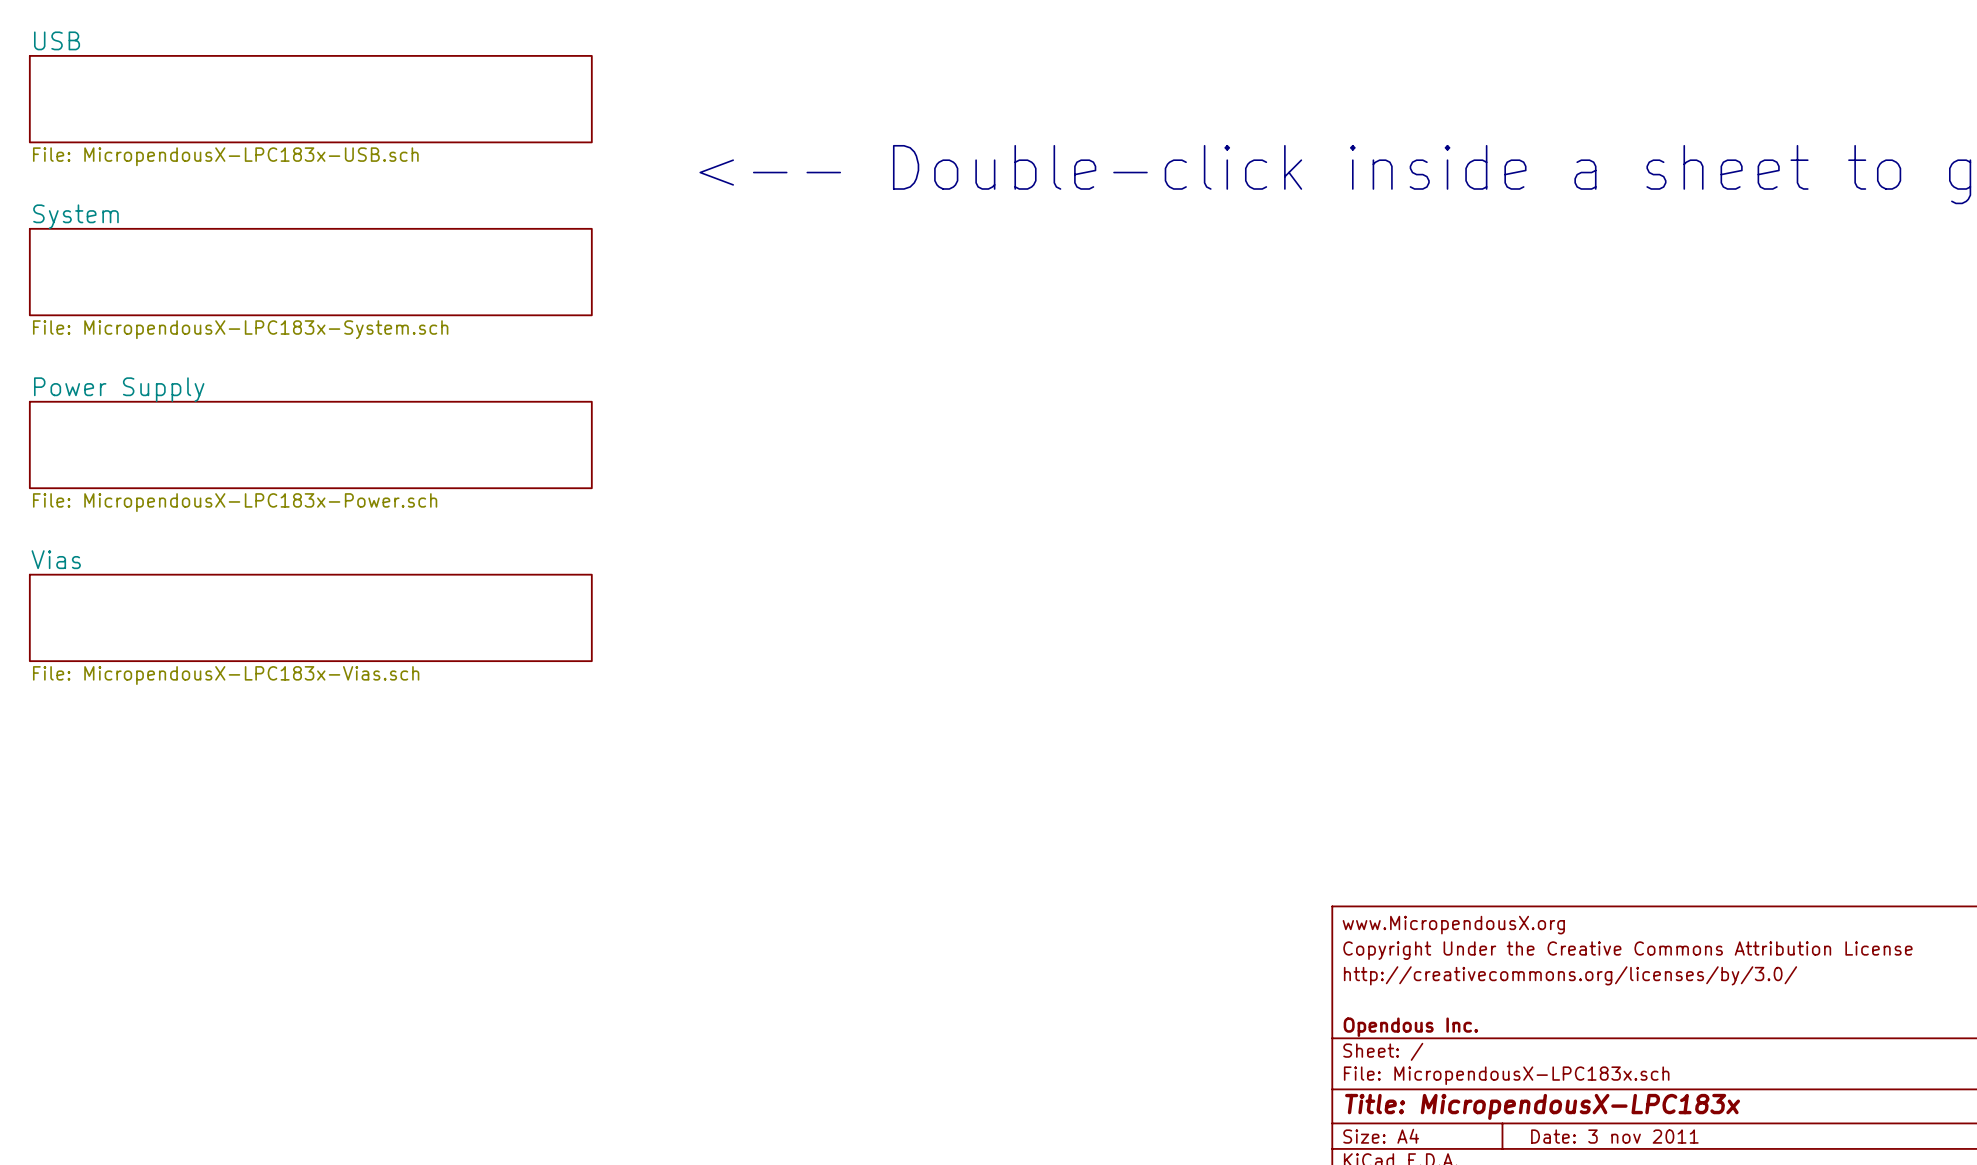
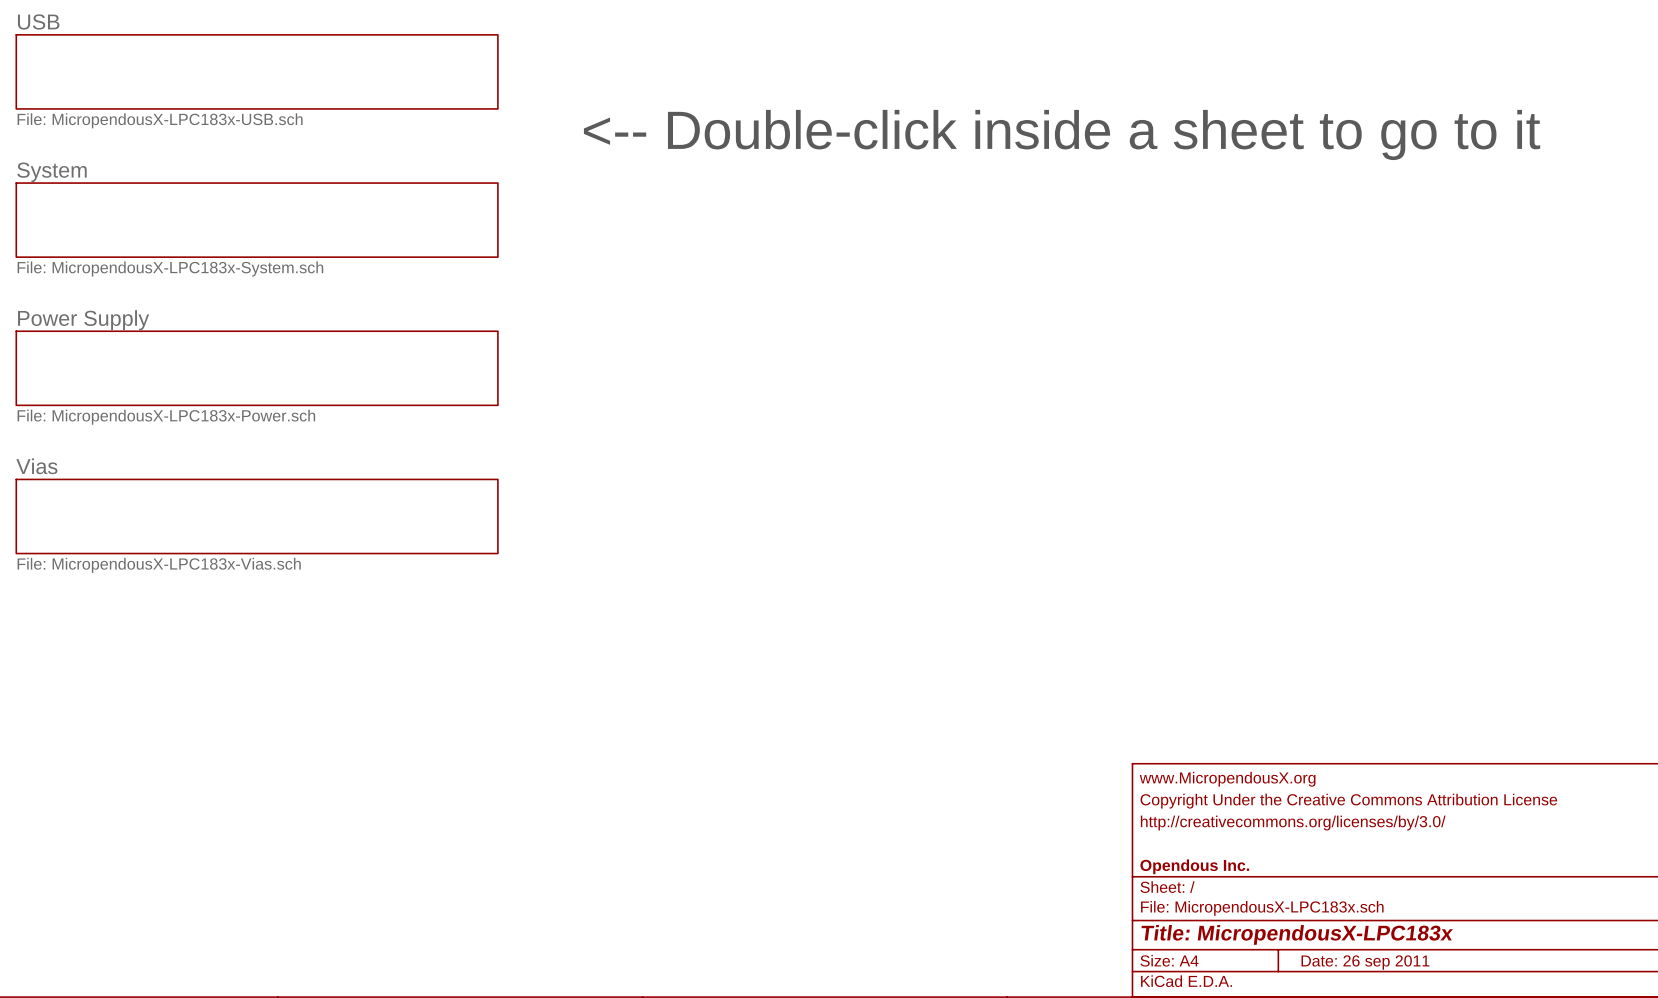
title block: Date: 3 nov 2011 (1614, 1136) -> Date: 26 sep 2011 (1365, 962)

